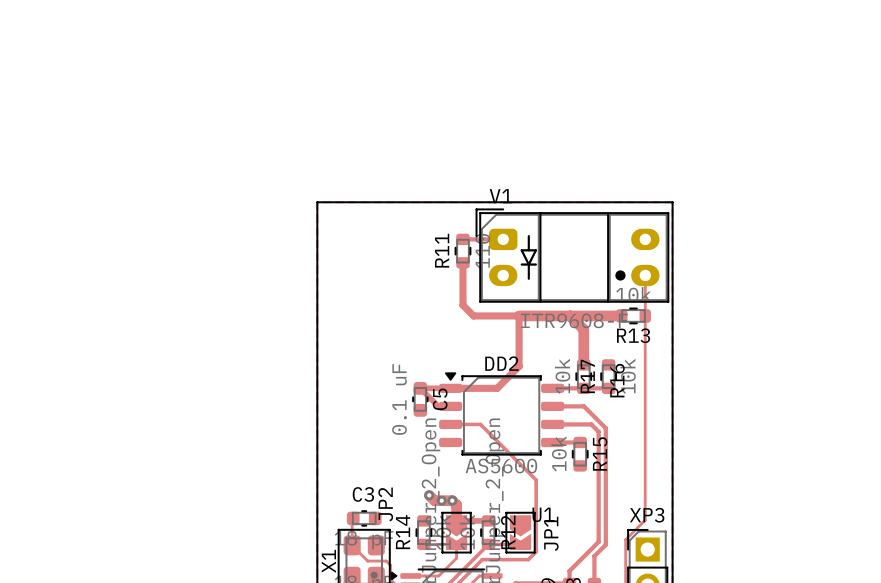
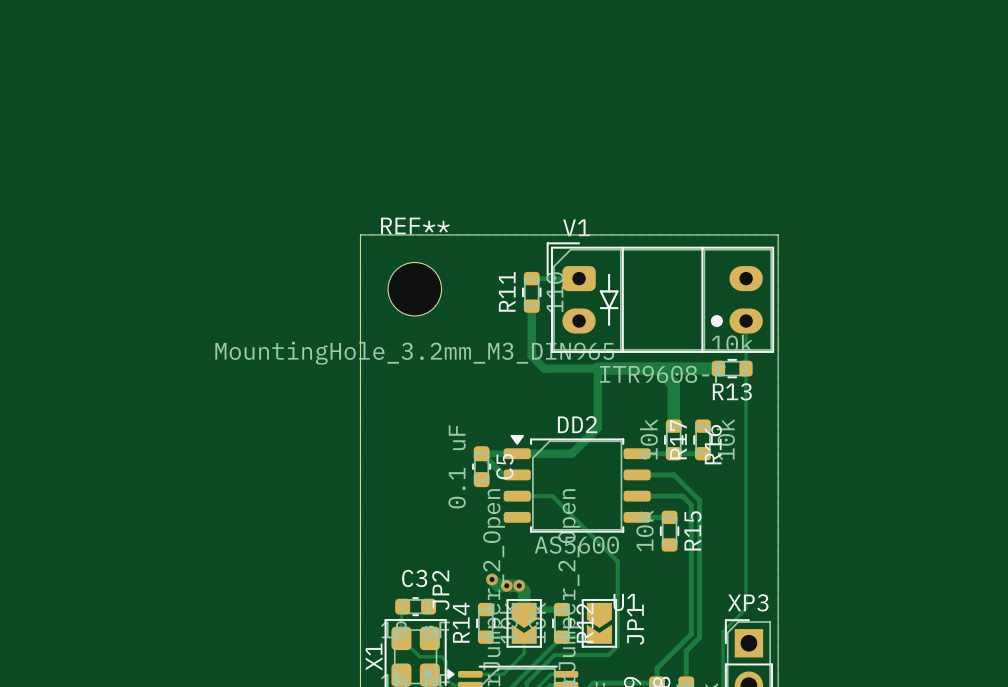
REF**: none -> MountingHole_3.2mm_M3_DIN965 (414, 289)

